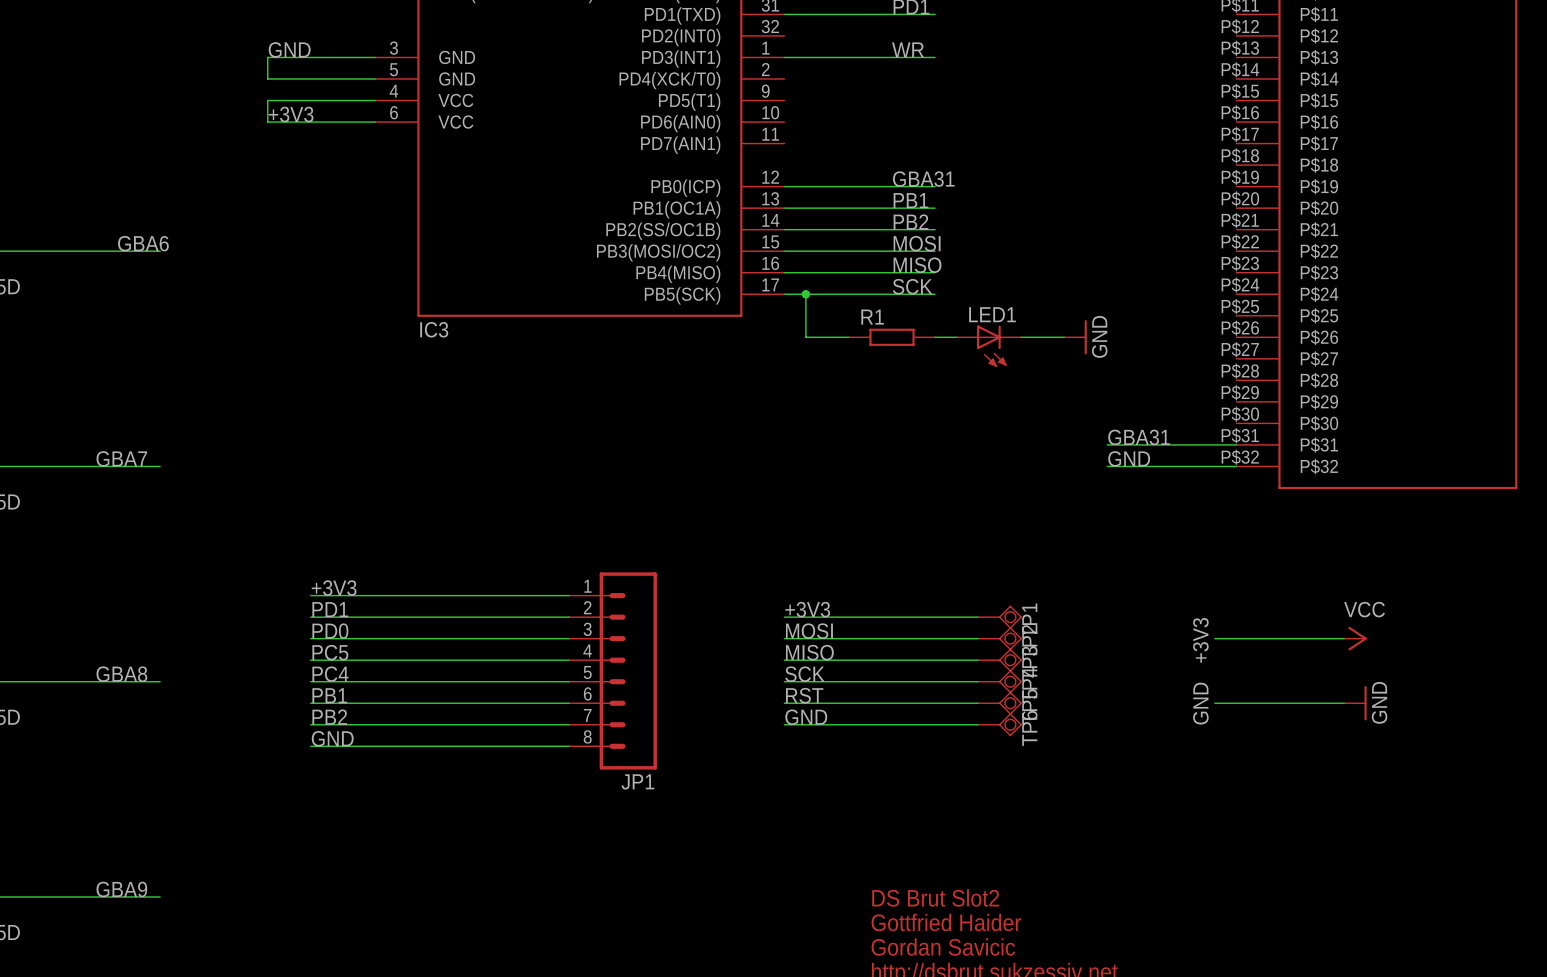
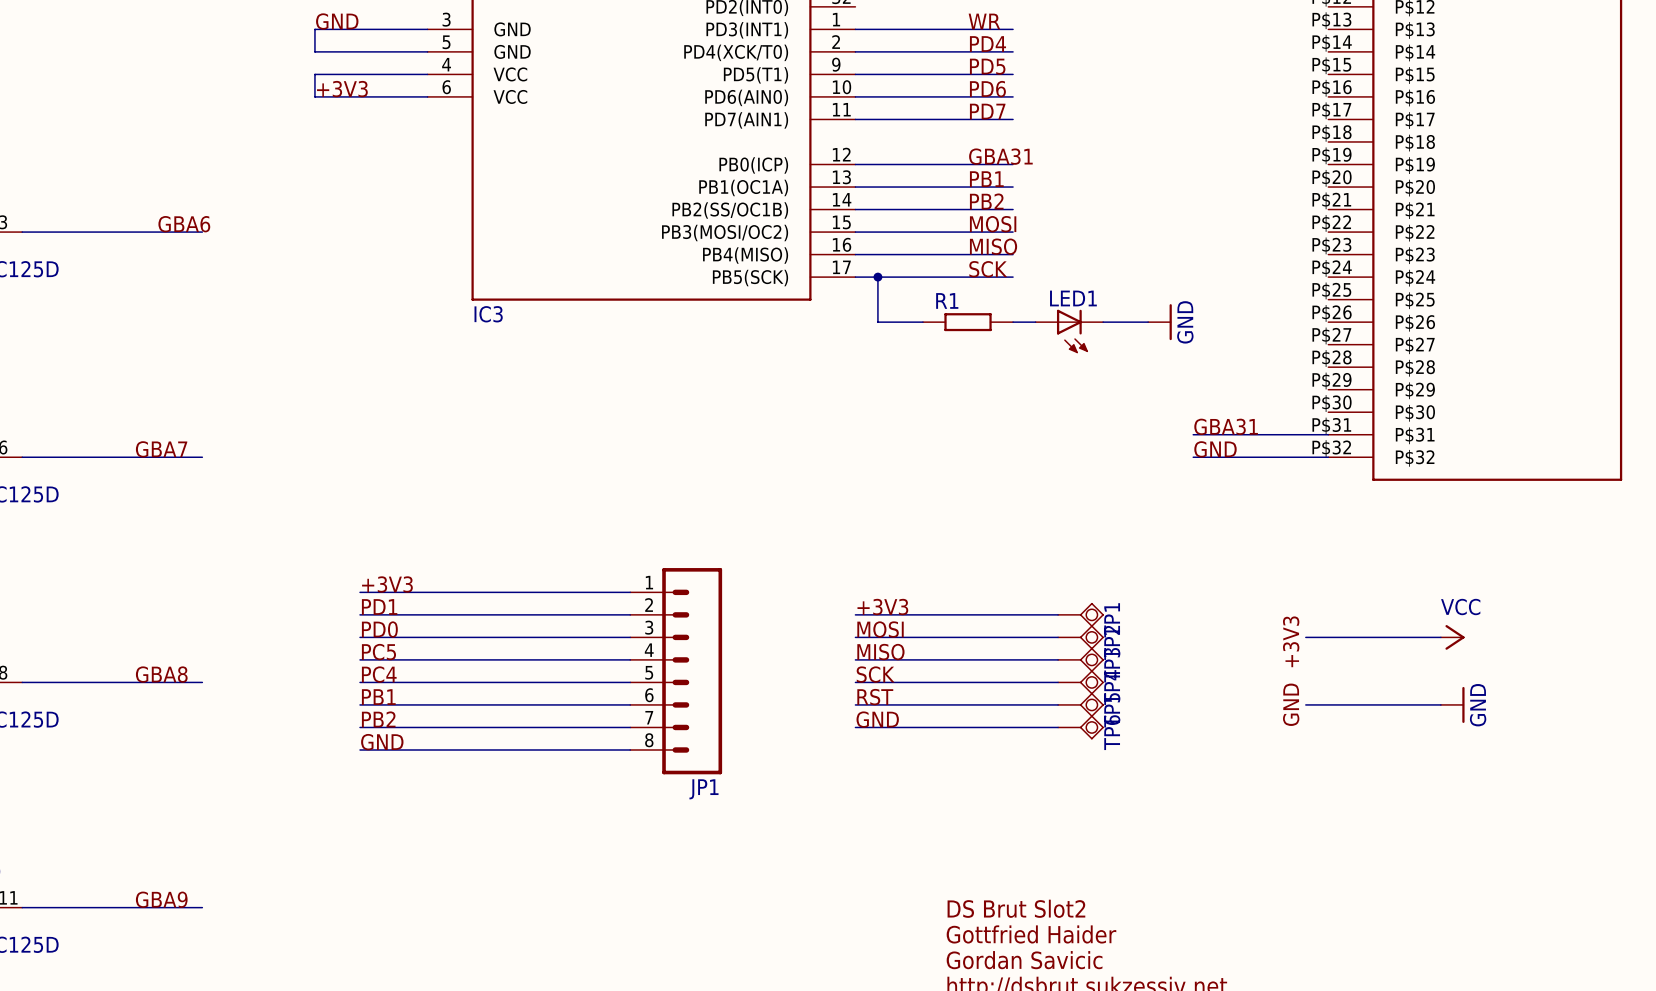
label: none -> PD4 (987, 44)
wire: none -> (855, 51) (1013, 51)
label: none -> PD5 (987, 66)
wire: none -> (855, 74) (1013, 74)
label: none -> PD6 (987, 89)
wire: none -> (855, 96) (1013, 96)
label: none -> PD7 (987, 111)
wire: none -> (855, 119) (1013, 119)

